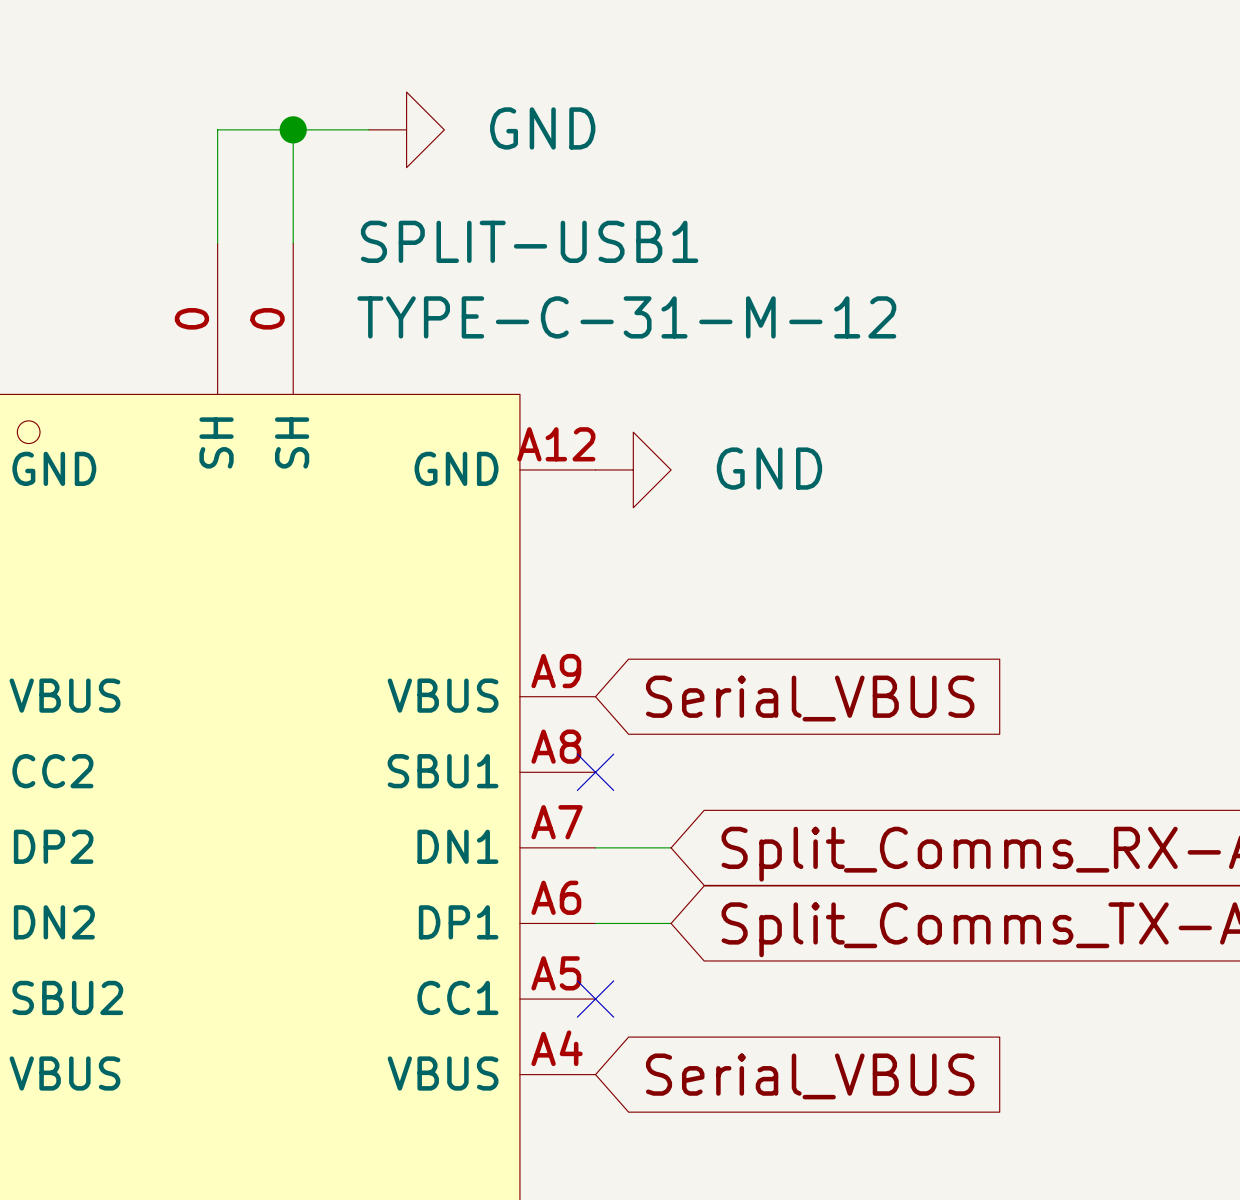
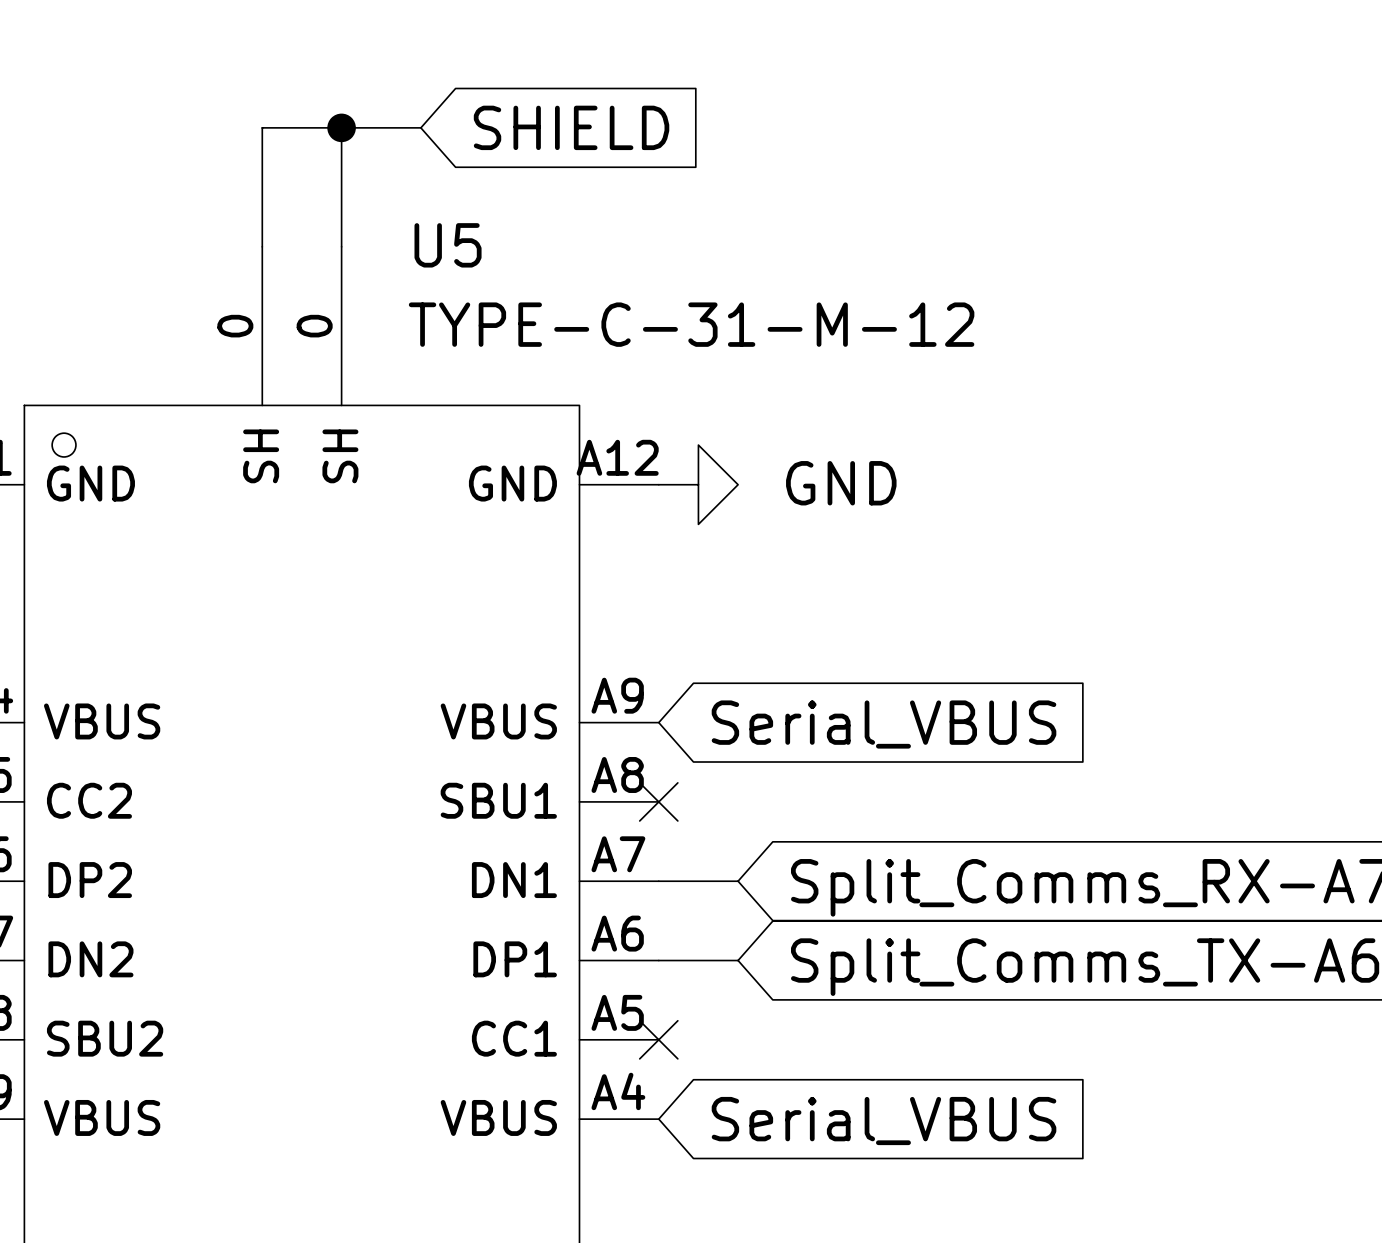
power symbol: GND (406, 129) -> none
global label: none -> SHIELD (571, 127)
SPLIT-USB1 name: SPLIT-USB1 (529, 241) -> U5 (448, 245)

